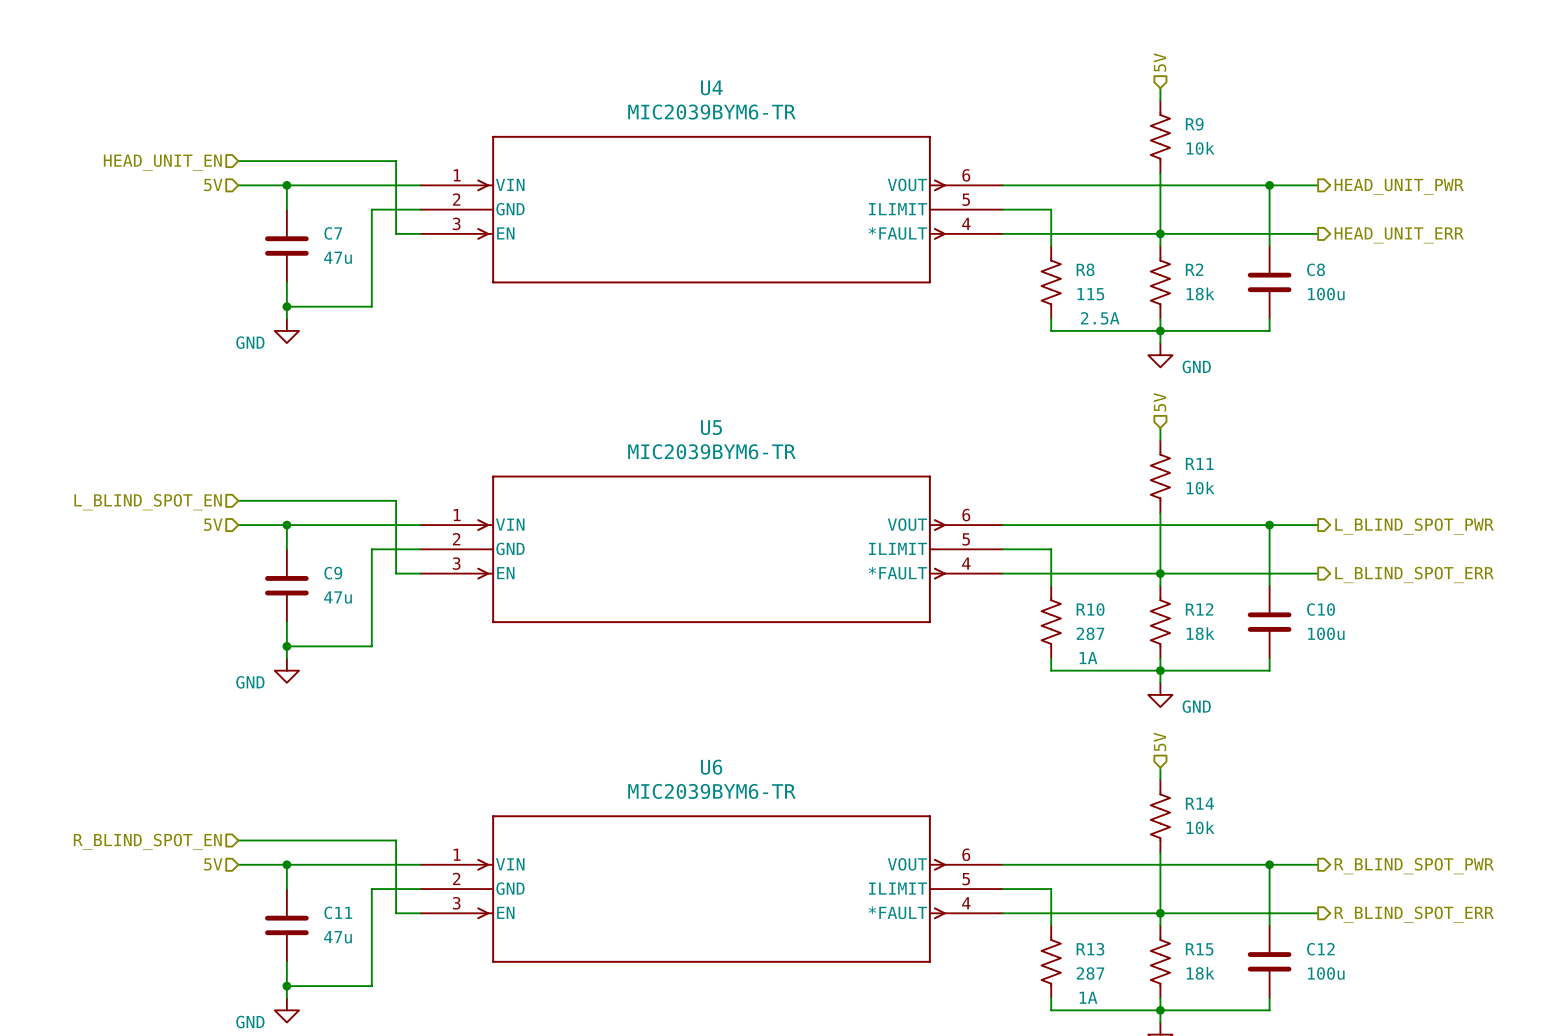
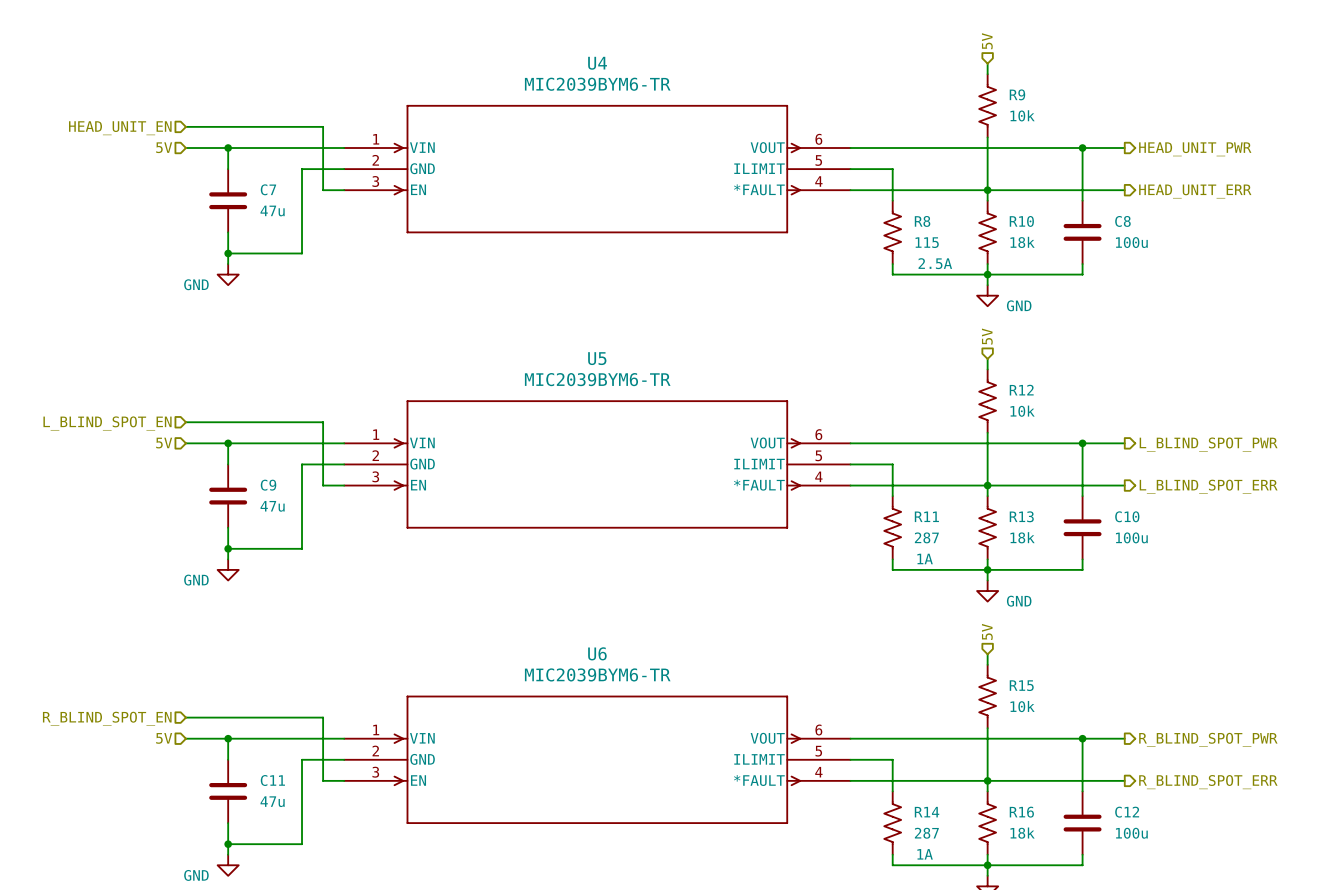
R2 name: R2 (1194, 269) -> R10 (1021, 221)
R11 name: R11 (1199, 463) -> R12 (1021, 390)
R10 name: R10 (1090, 609) -> R11 (926, 516)
R12 name: R12 (1199, 609) -> R13 (1021, 516)
R14 name: R14 (1199, 803) -> R15 (1021, 685)
R13 name: R13 (1090, 949) -> R14 (927, 812)
R15 name: R15 (1199, 949) -> R16 (1021, 812)

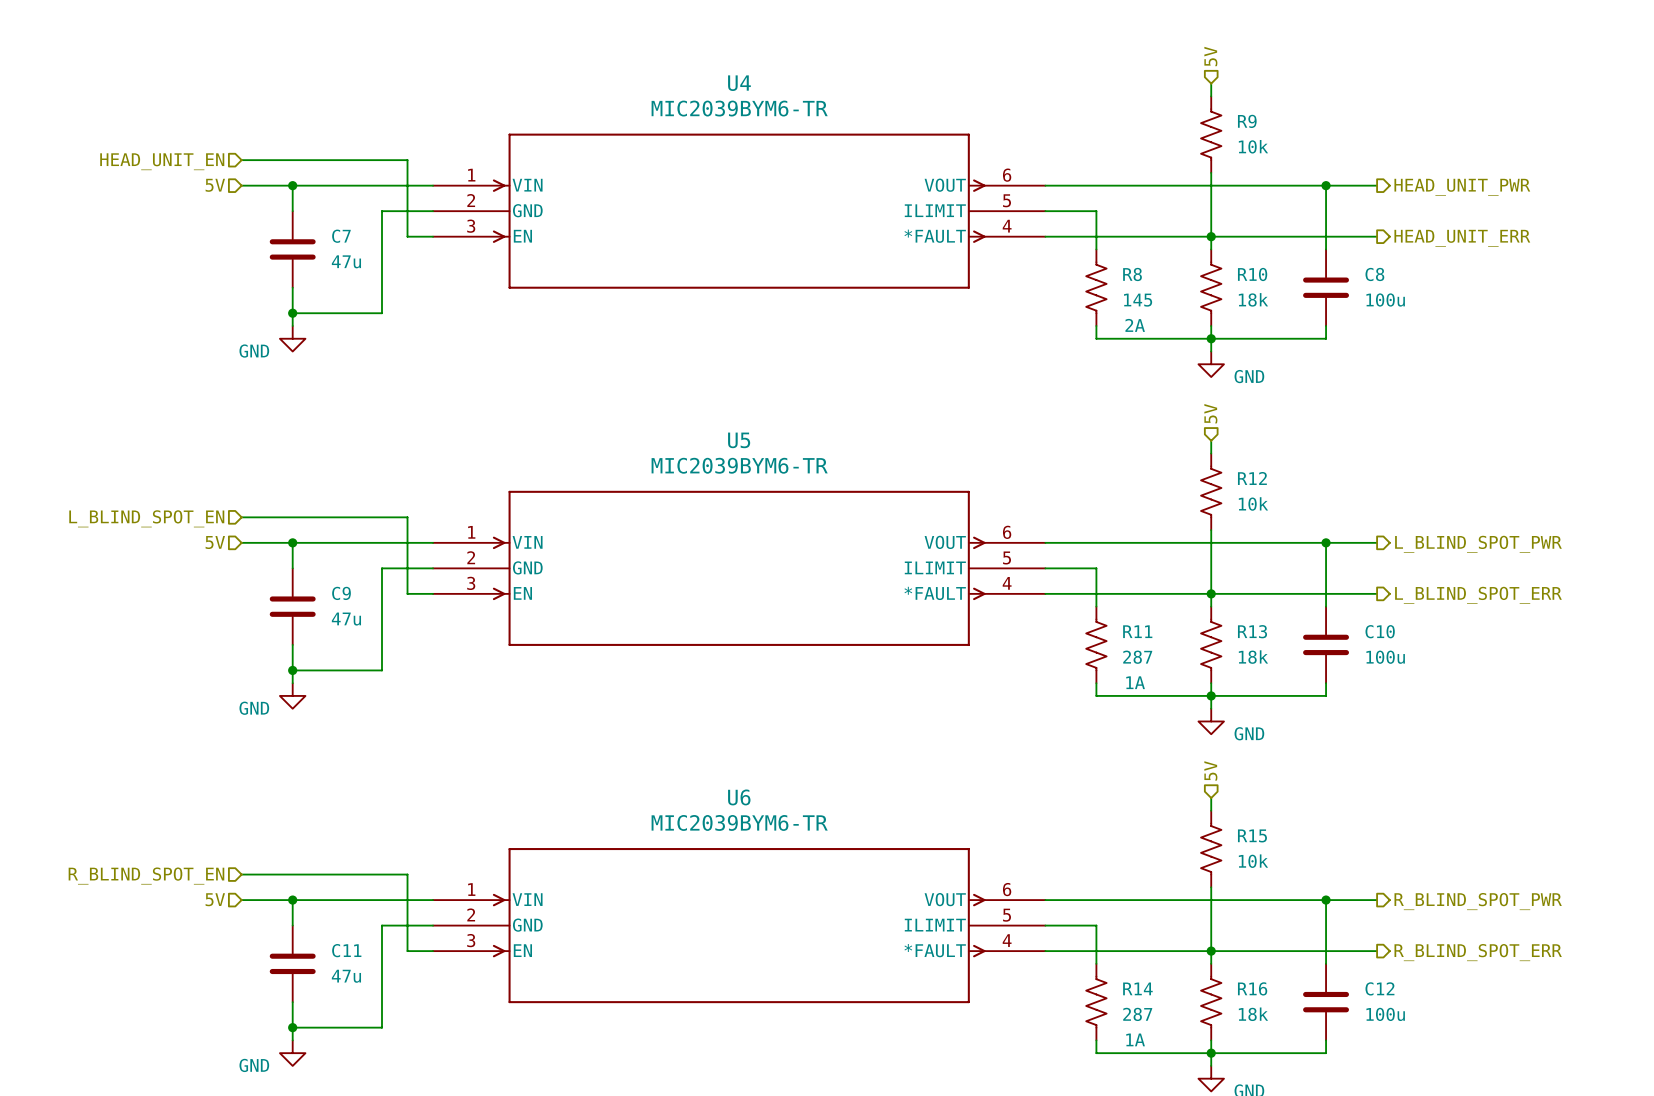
R8 value: 115 (927, 242) -> 145 (1138, 300)
R8 text: 2.5A (935, 263) -> 2A (1135, 325)

